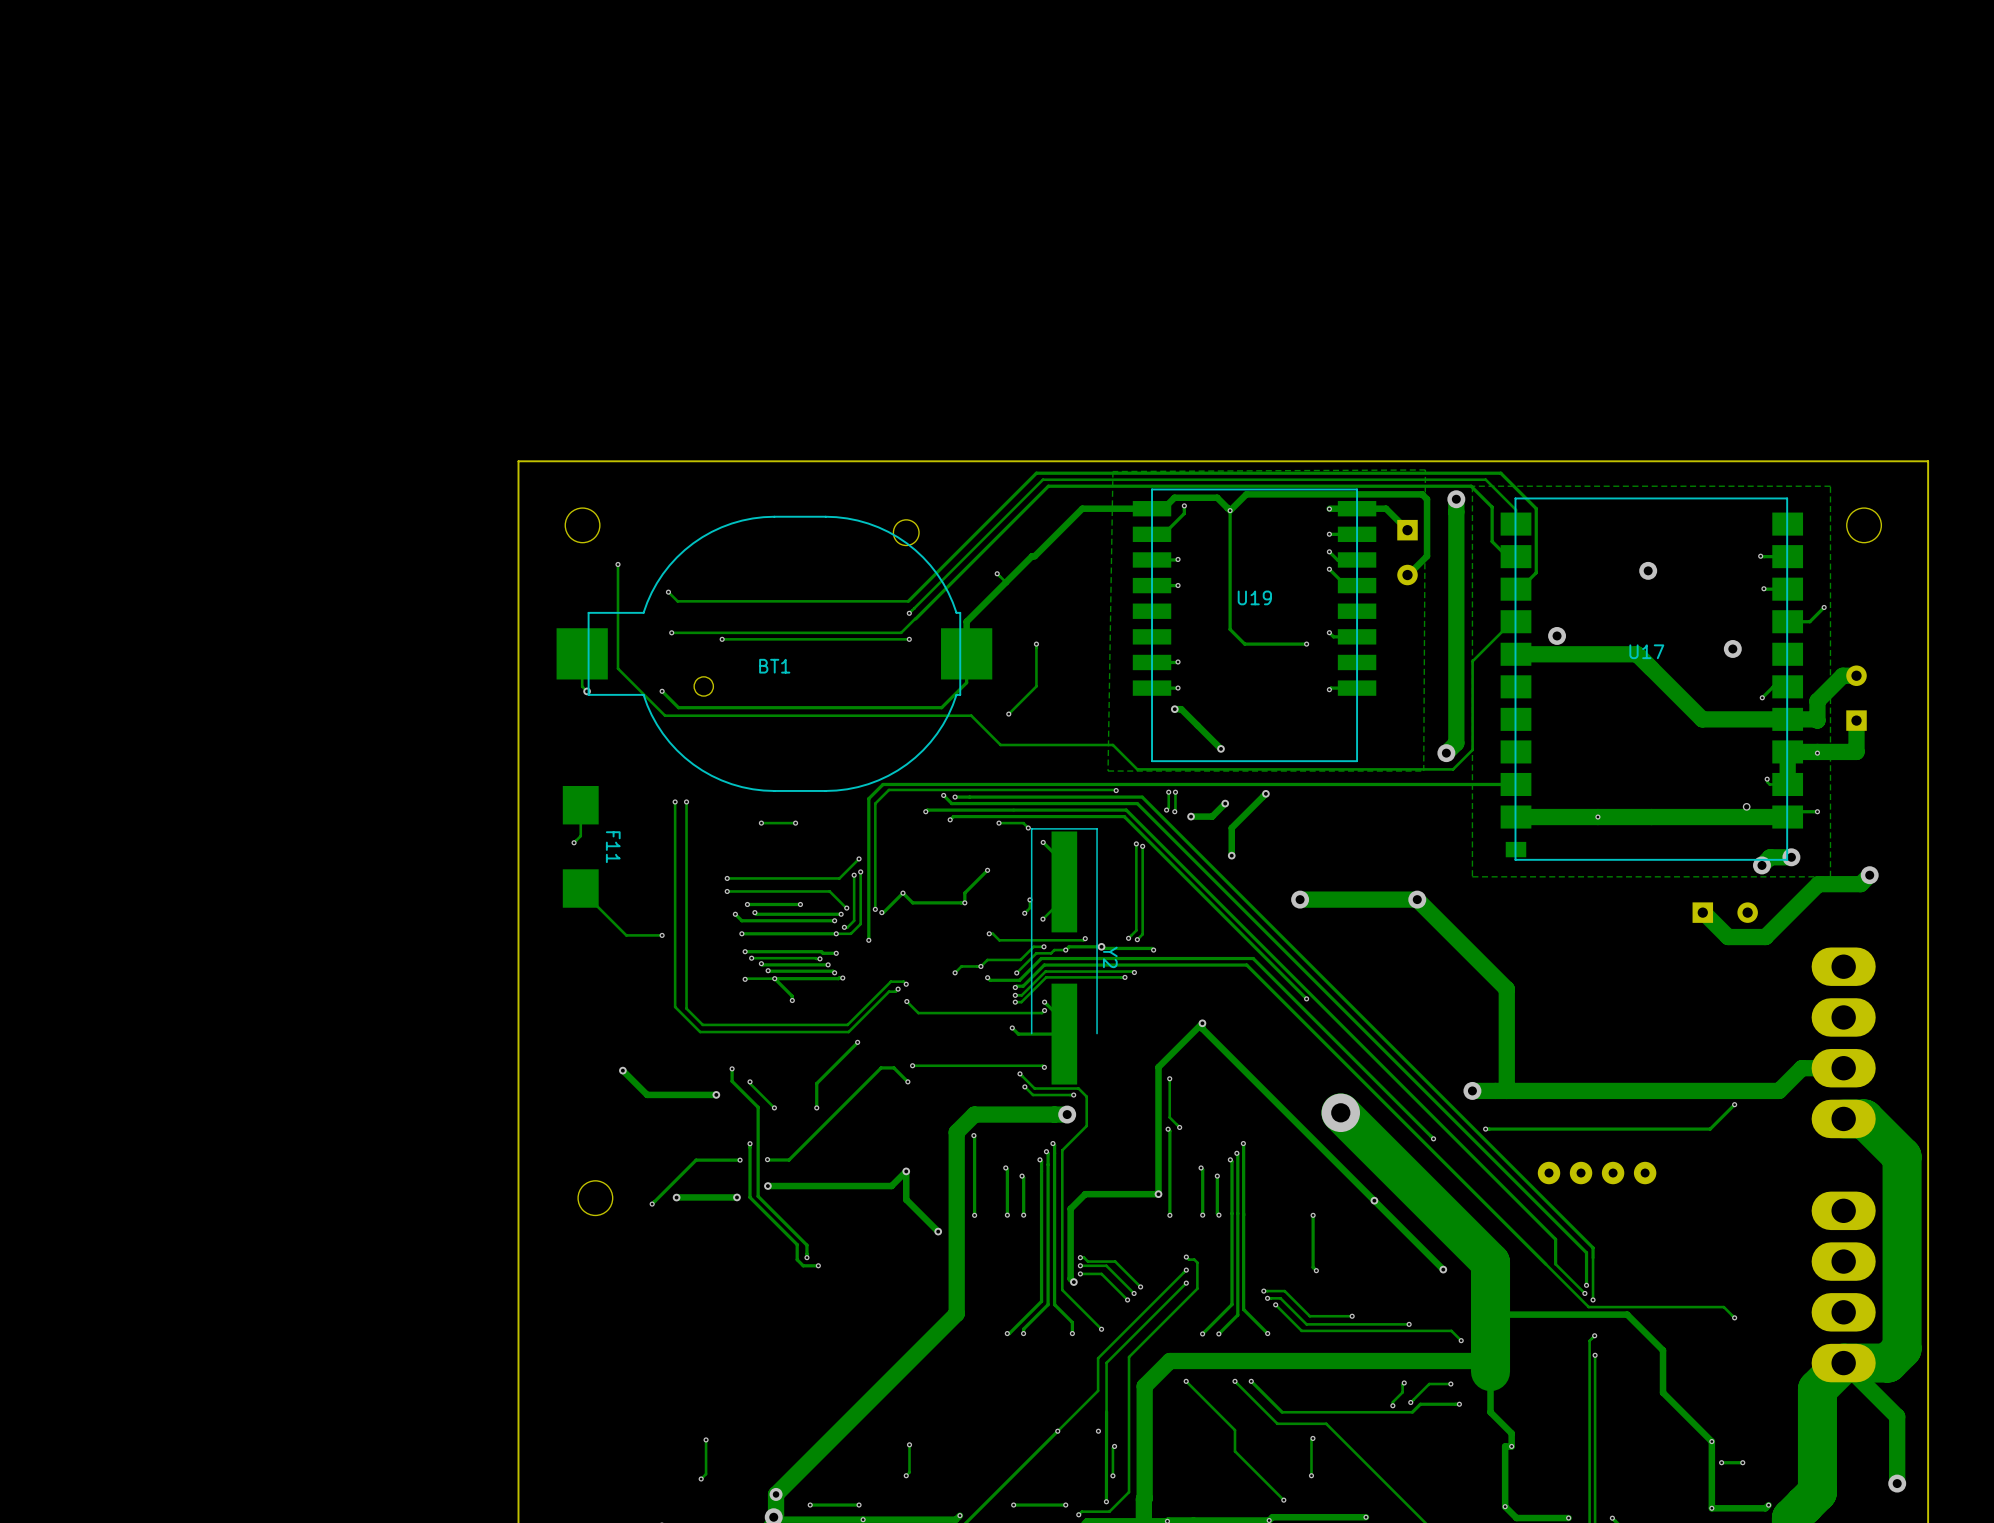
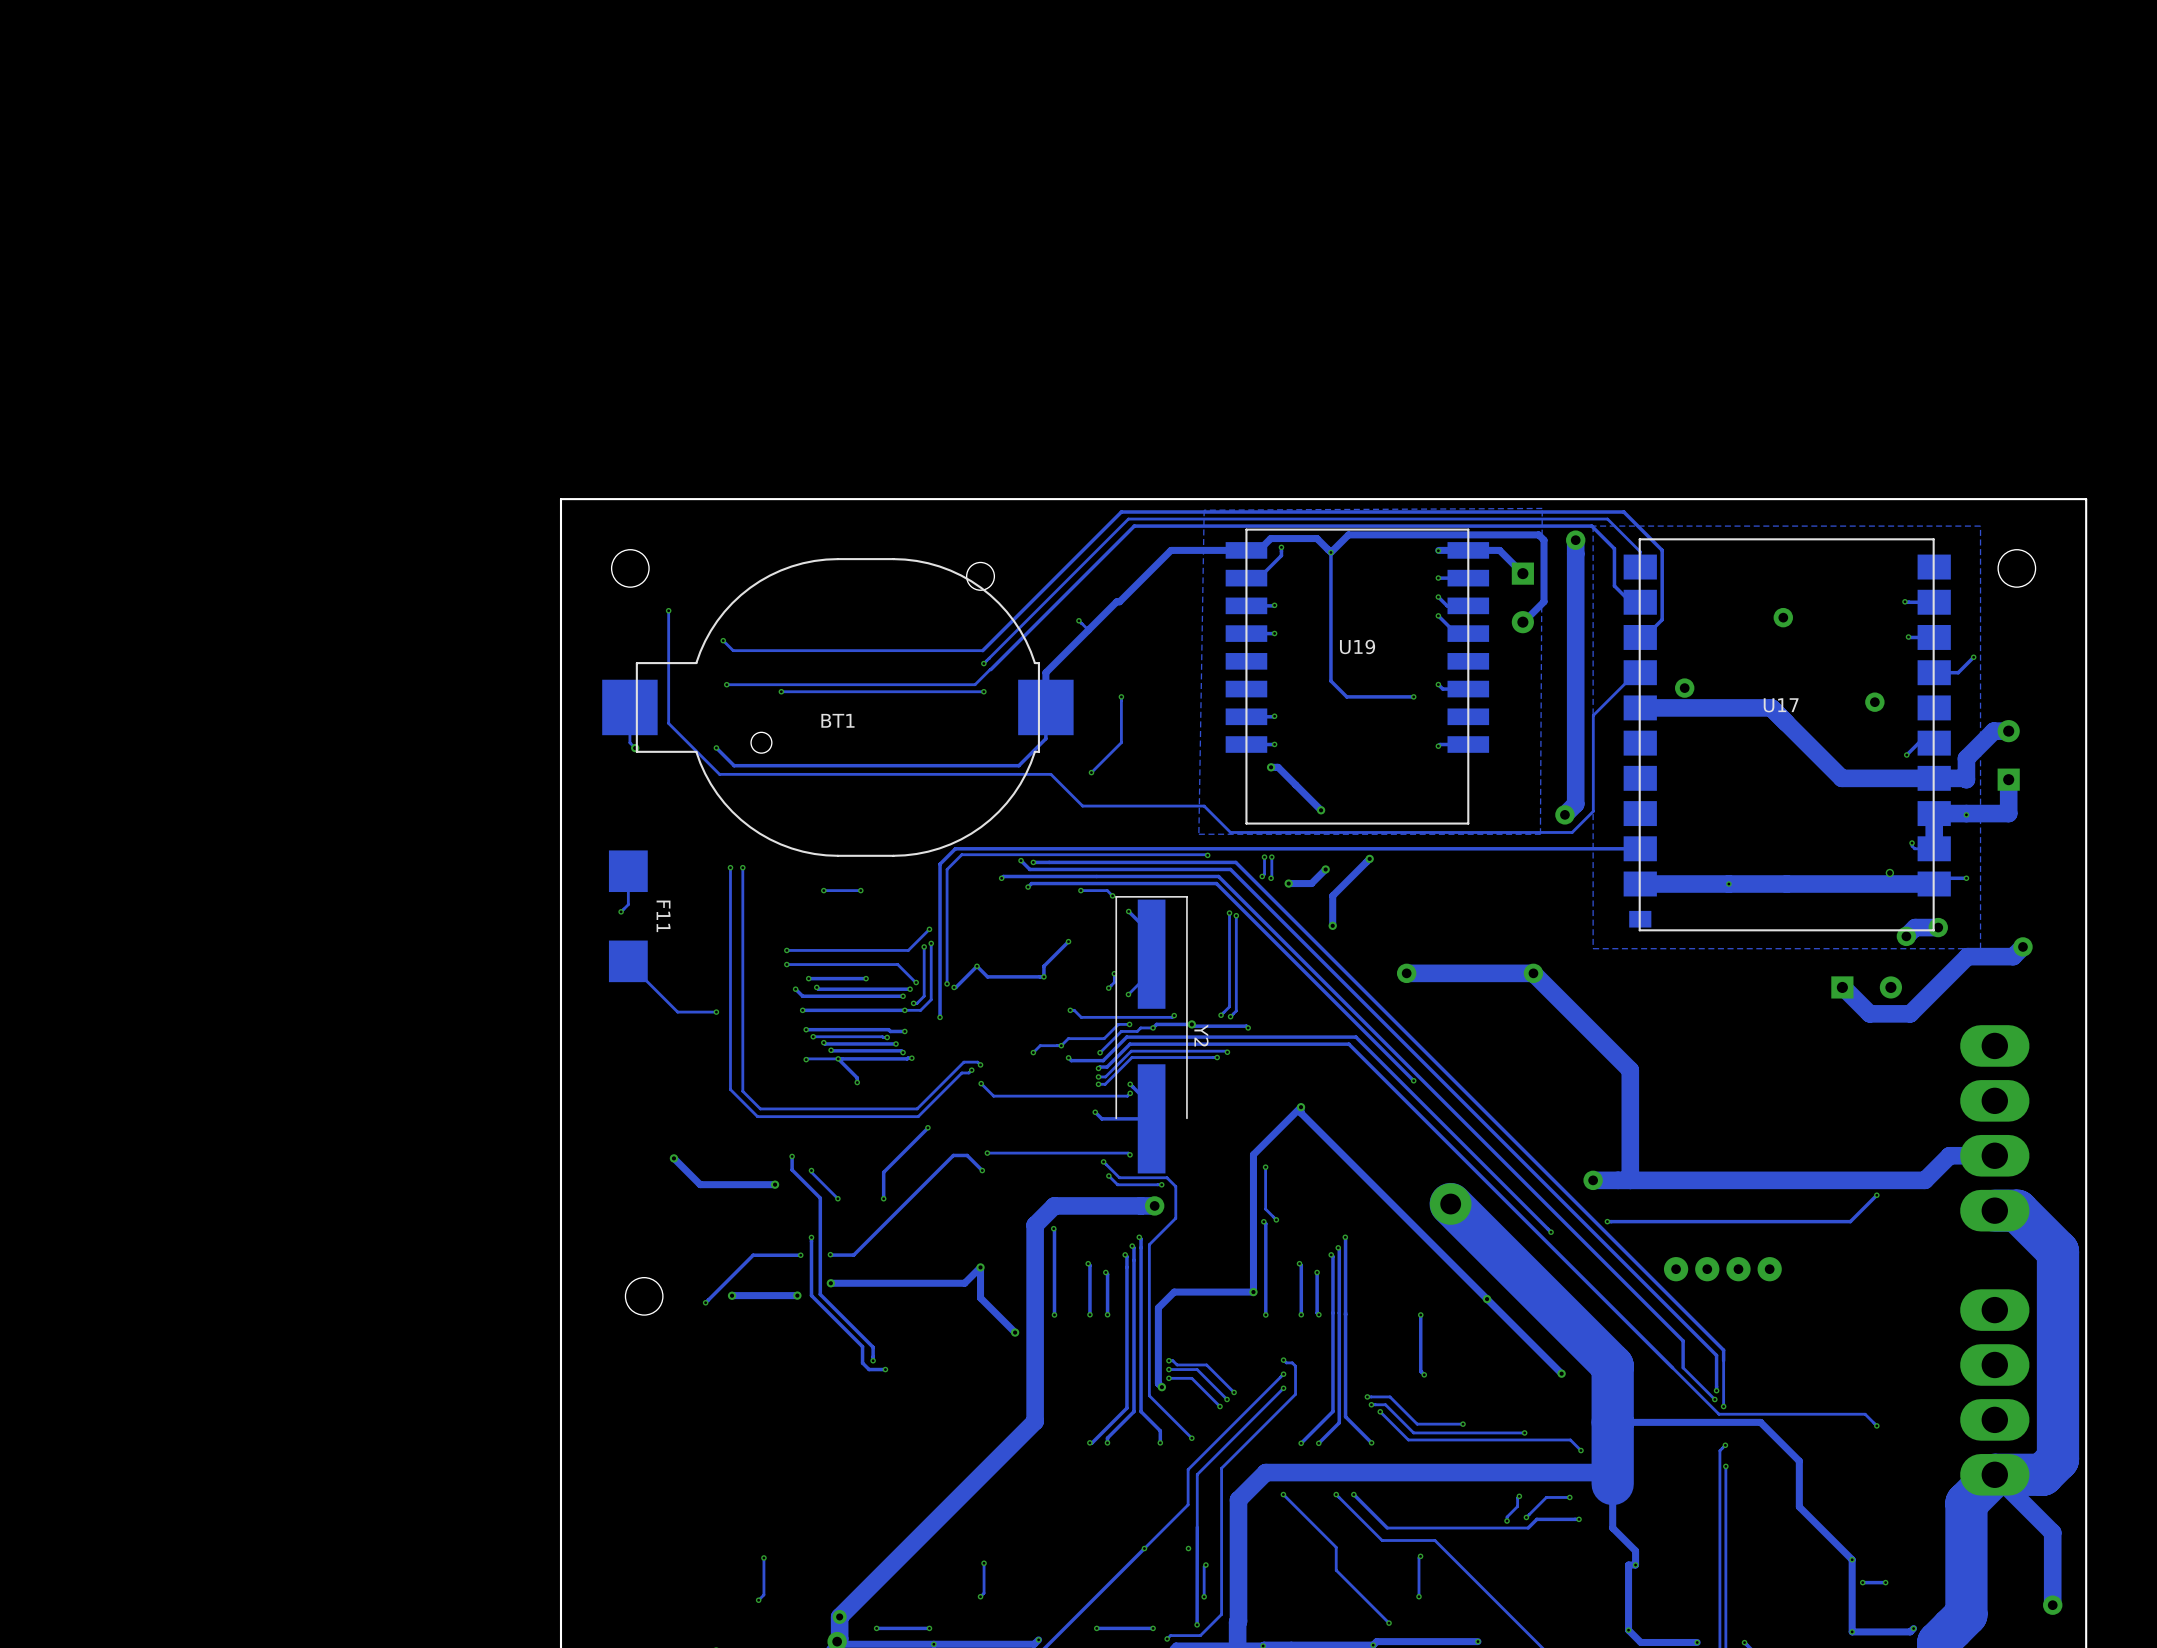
part footprint: [1537, 1161, 1657, 1185] -> [1663, 1257, 1782, 1282]

